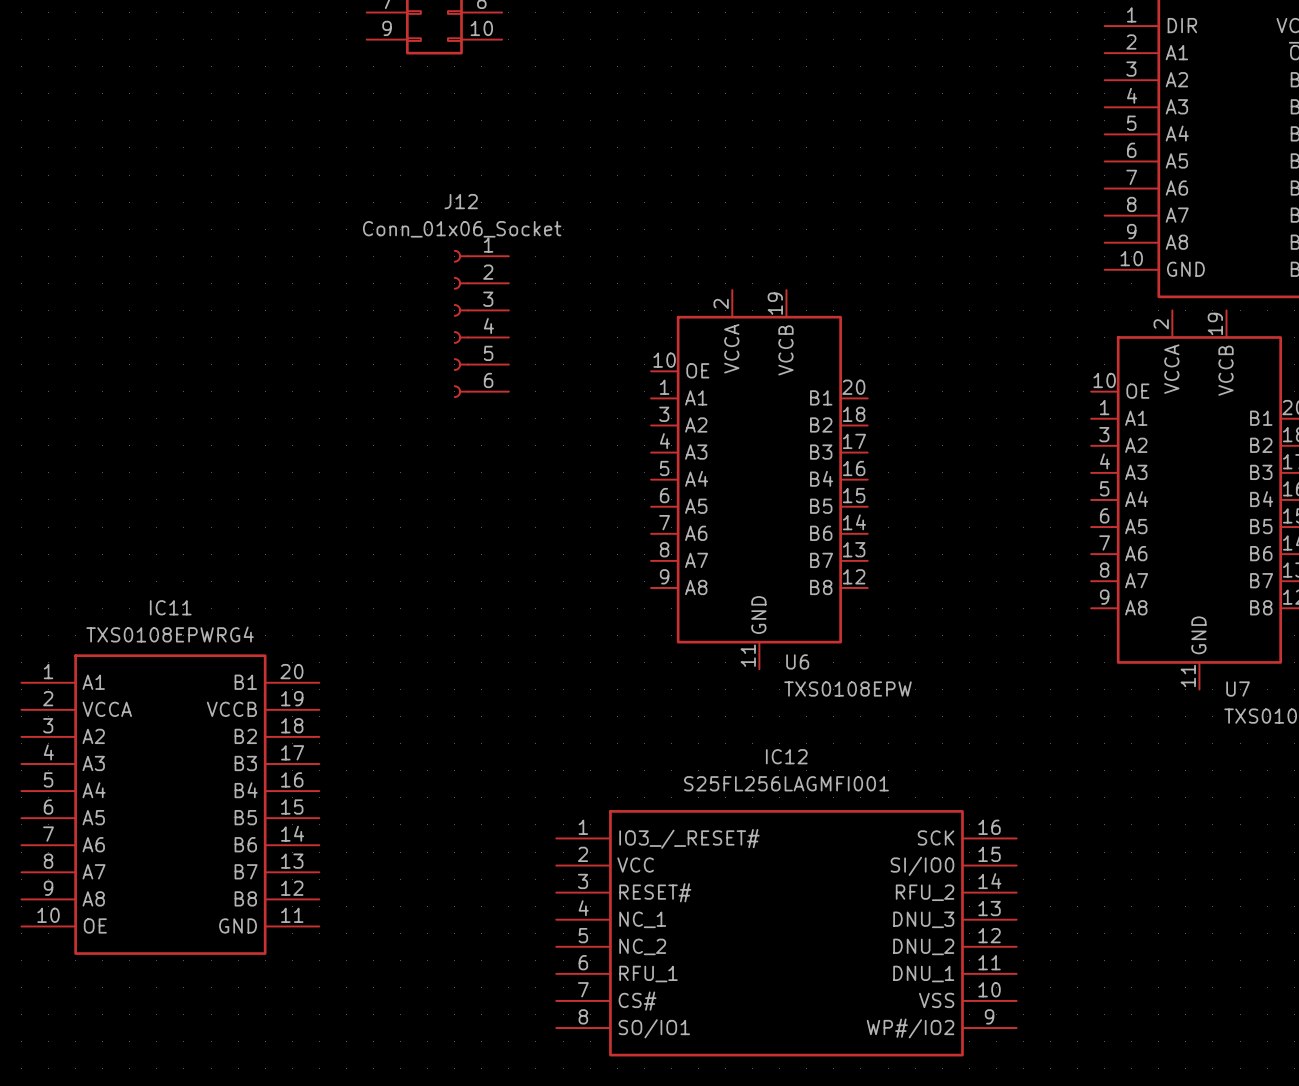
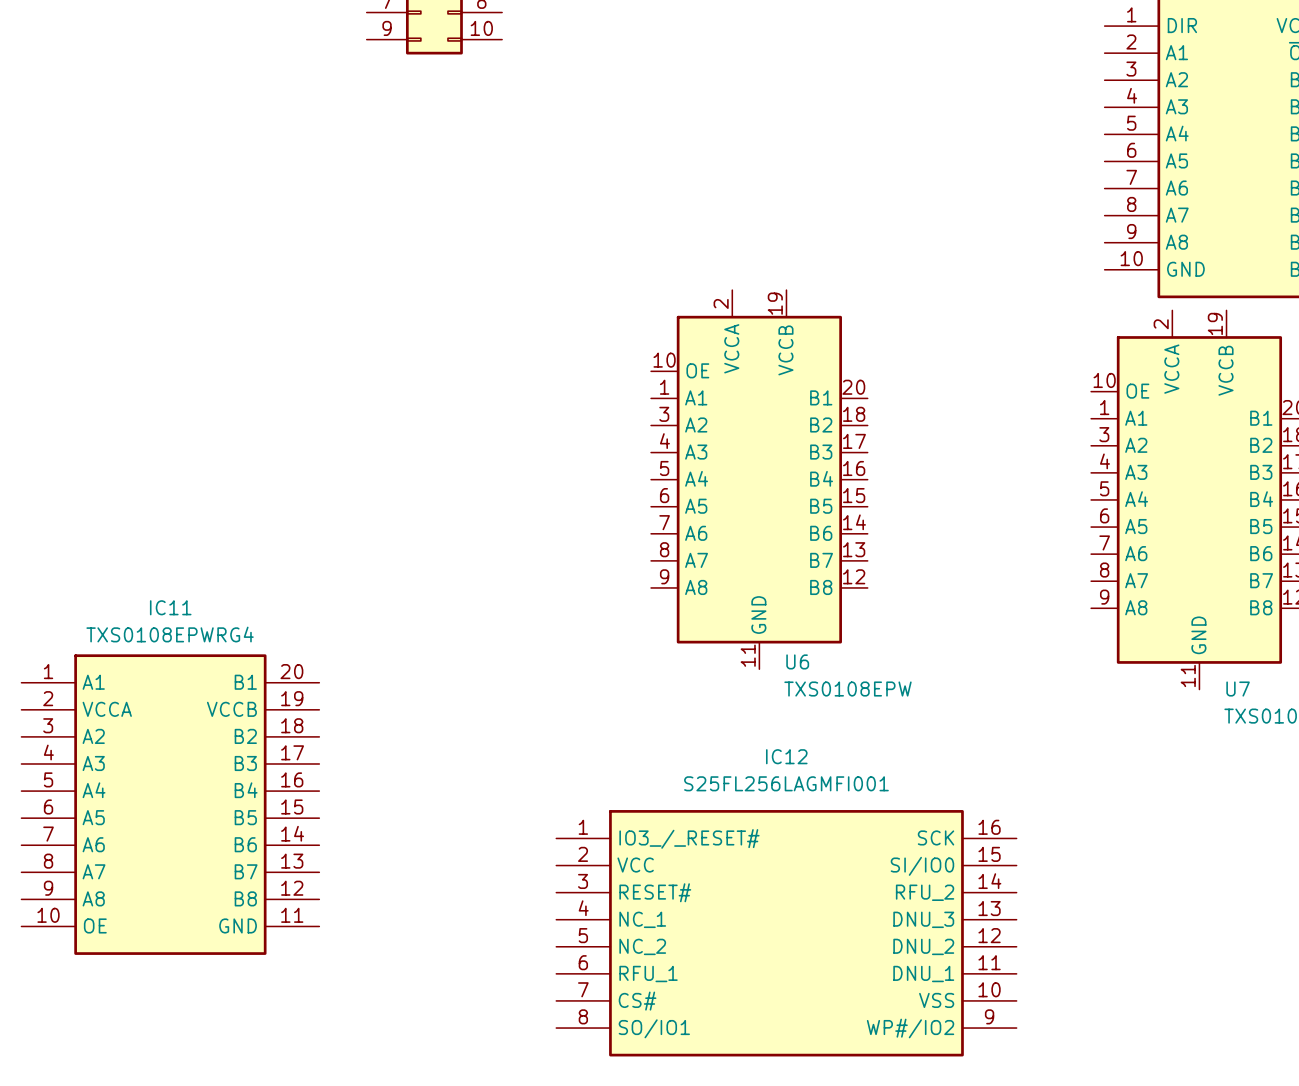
J12: Conn_01x06_Socket (481, 323) -> none

